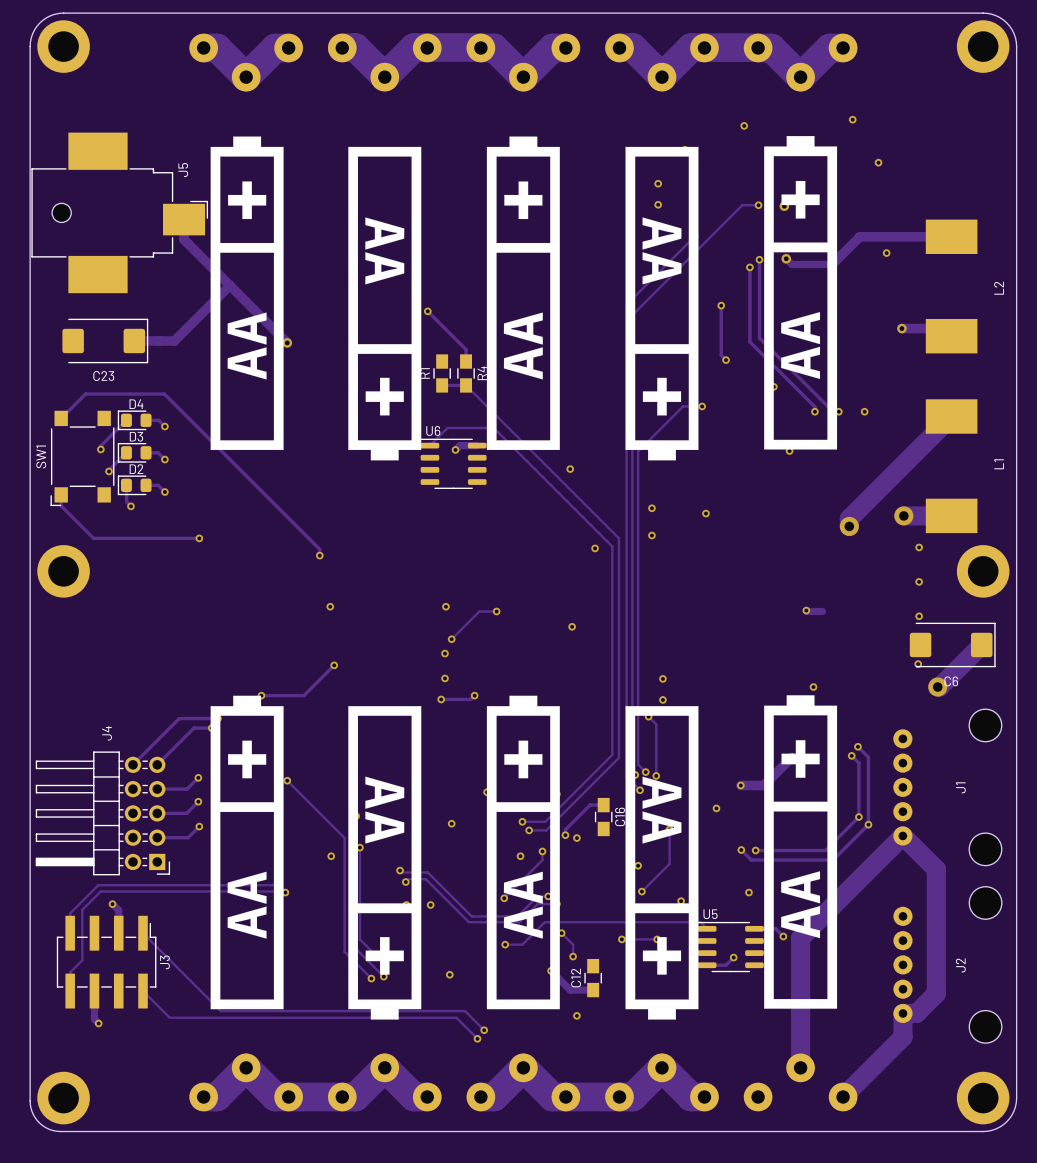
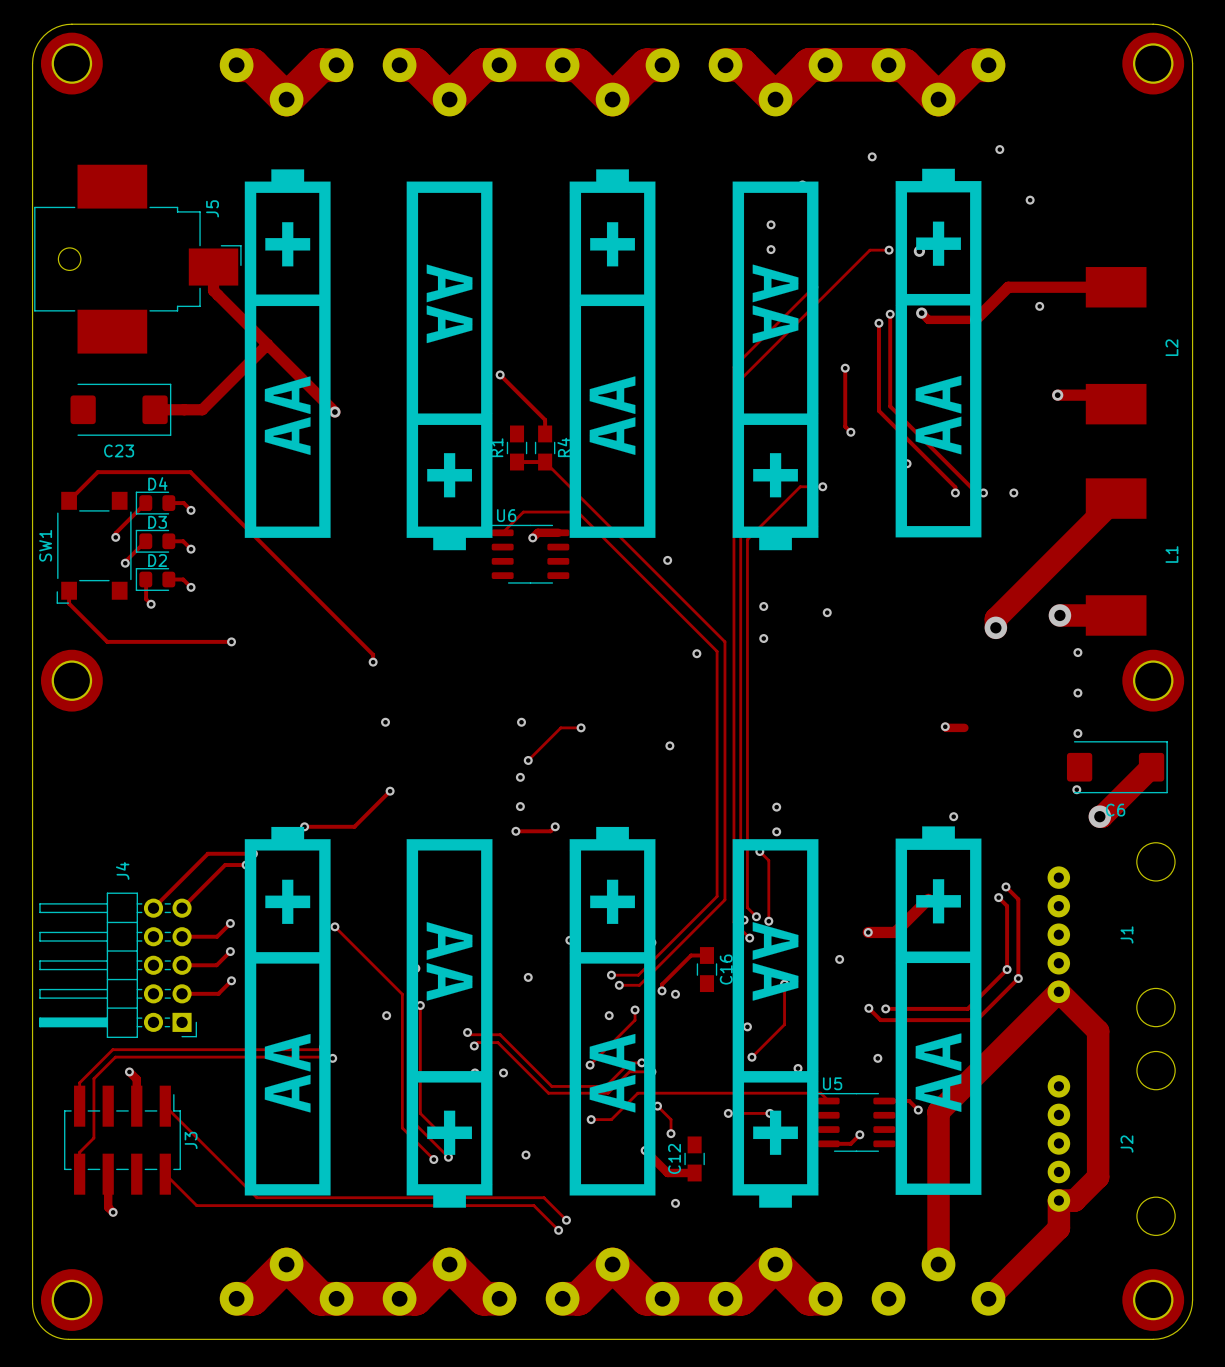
via: (789, 451) -> none

